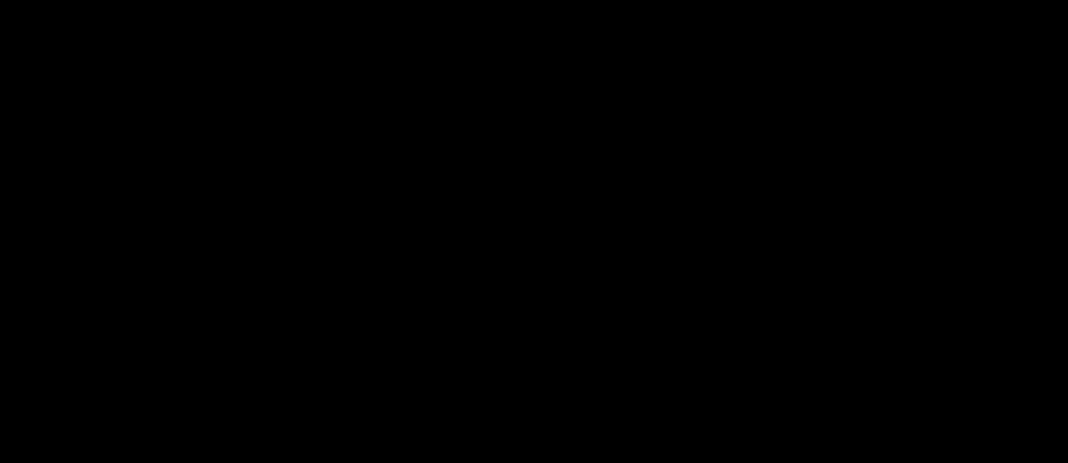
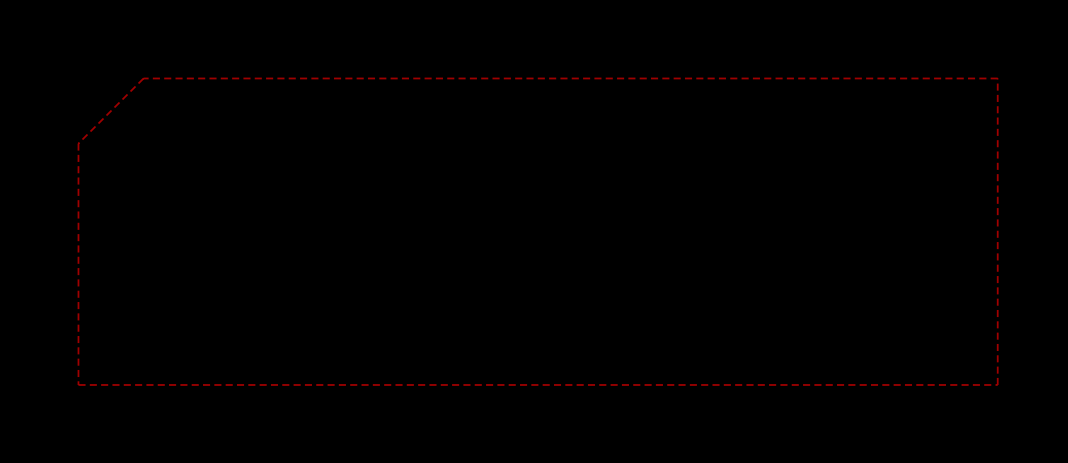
zone outline: none -> (143, 78) (997, 78) (997, 384) (78, 384) (78, 143) (143, 78)

